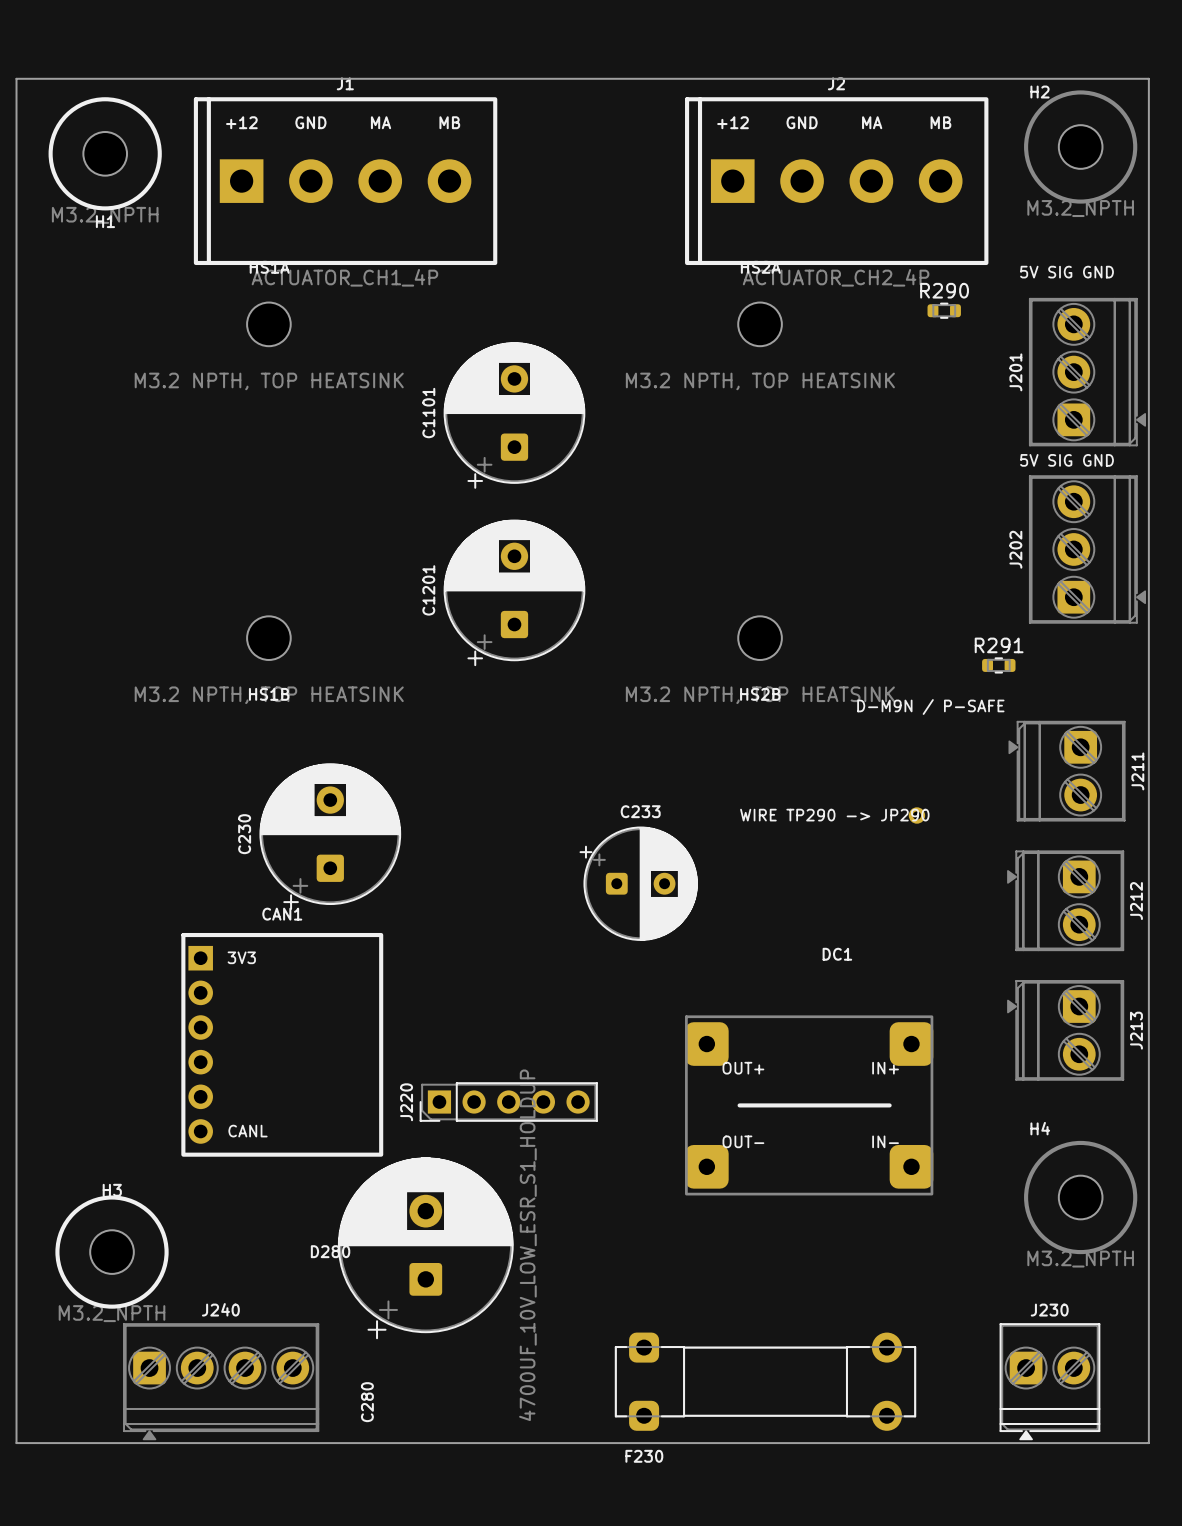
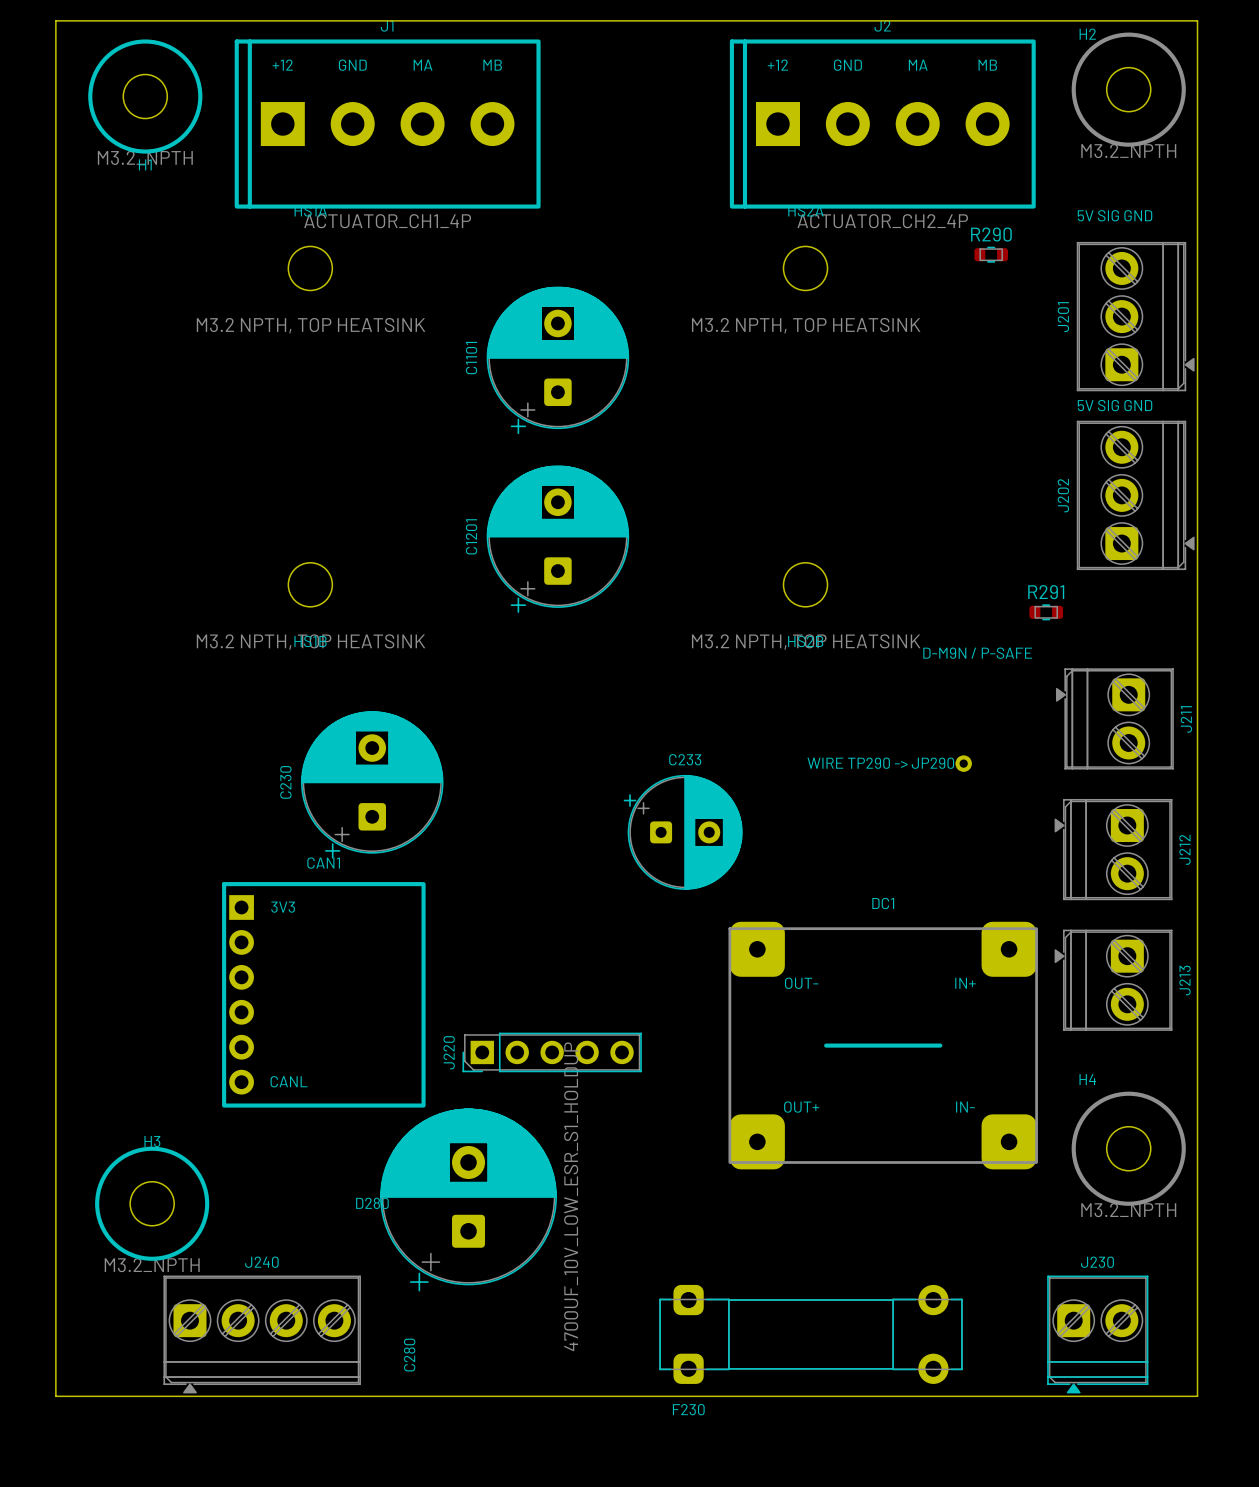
DC1 footprint: [685, 1015, 934, 1196] -> [728, 921, 1038, 1170]

